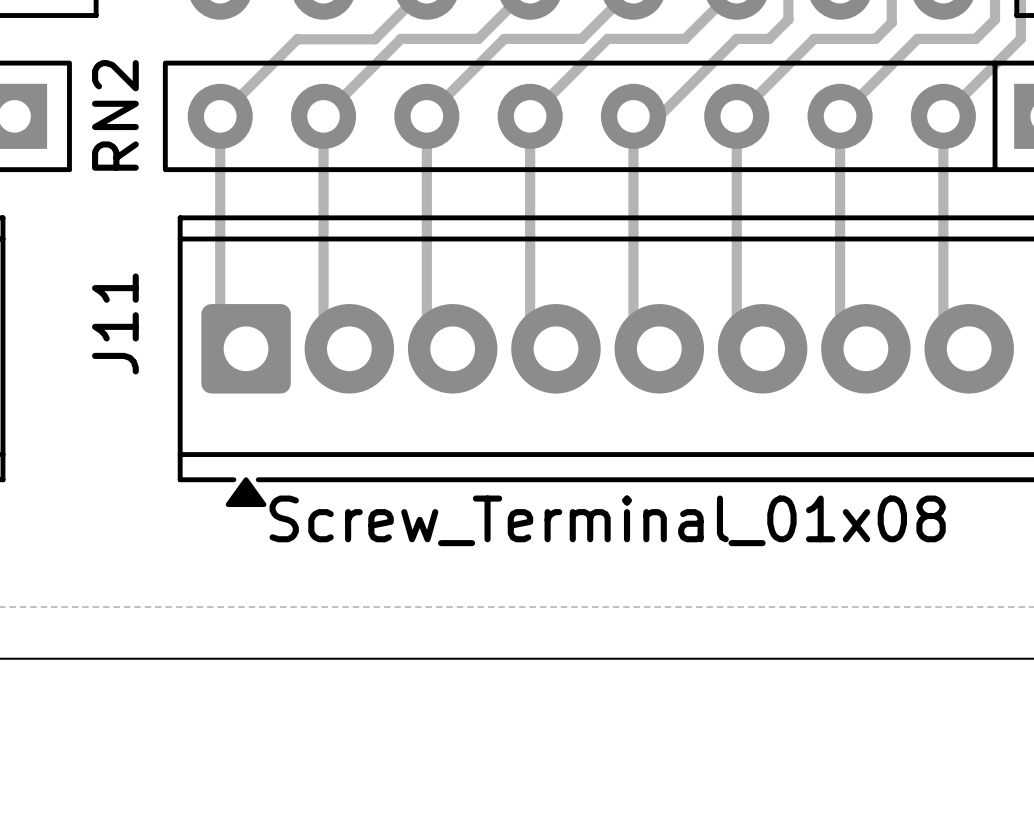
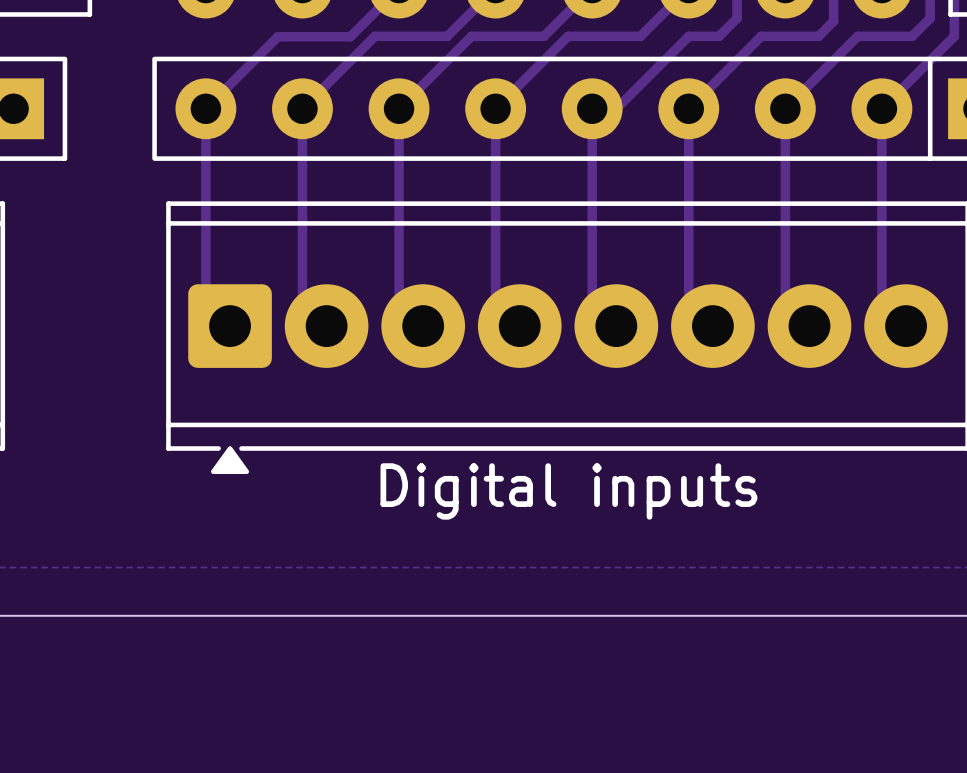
RN2 name: RN2 (115, 115) -> none
J11 name: J11 (115, 323) -> none
J11 value: Screw_Terminal_01x08 (607, 520) -> Digital inputs (568, 491)

